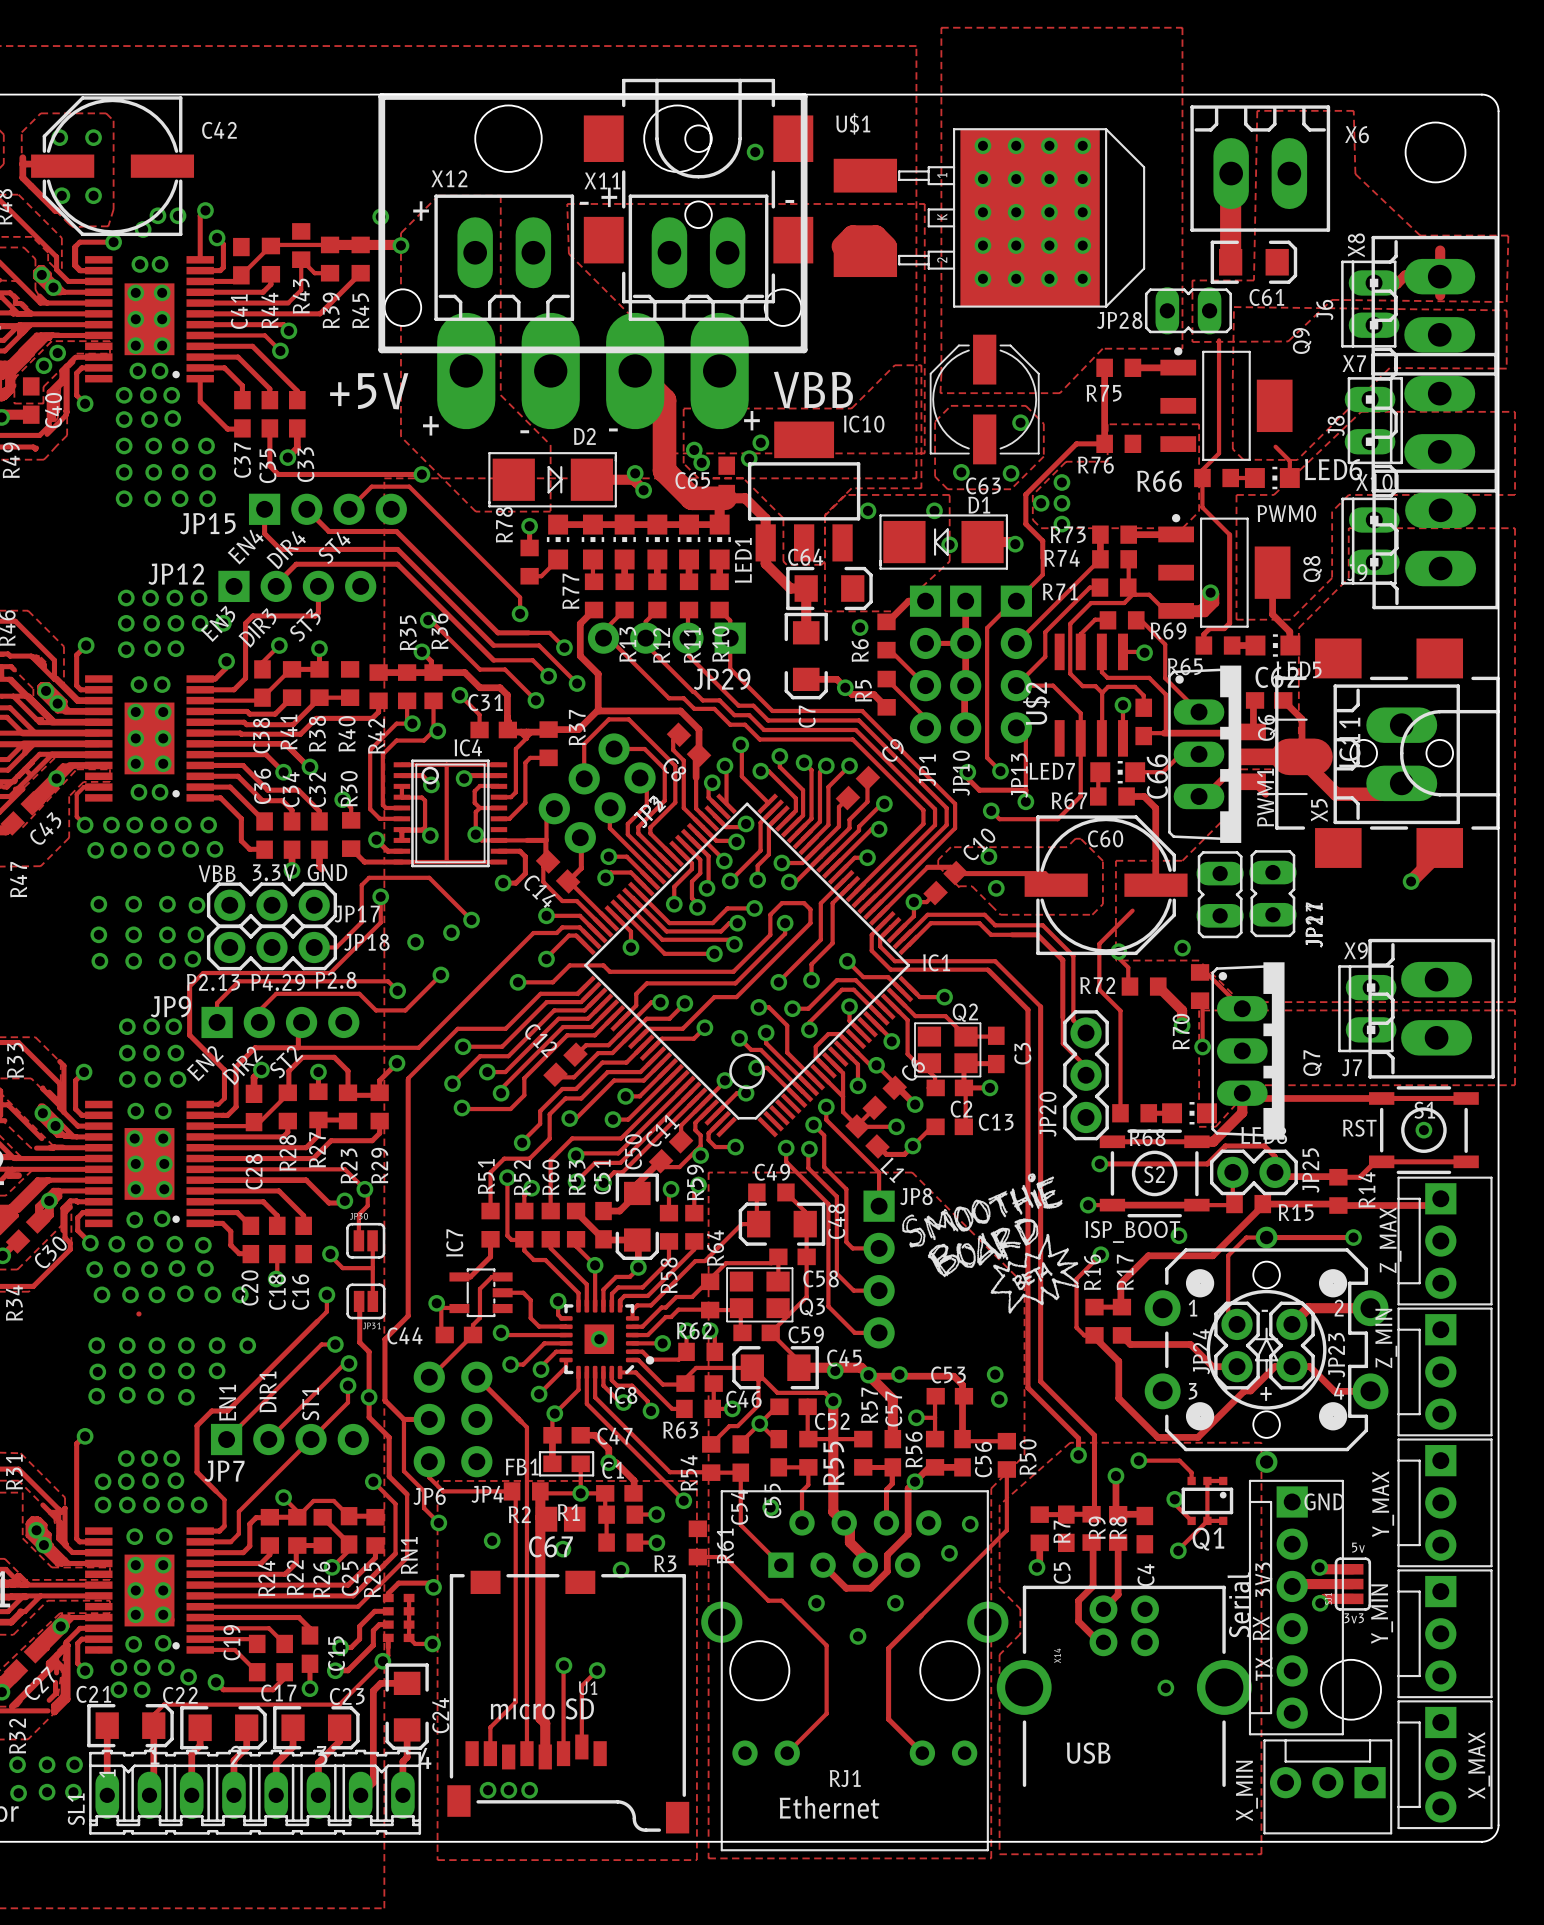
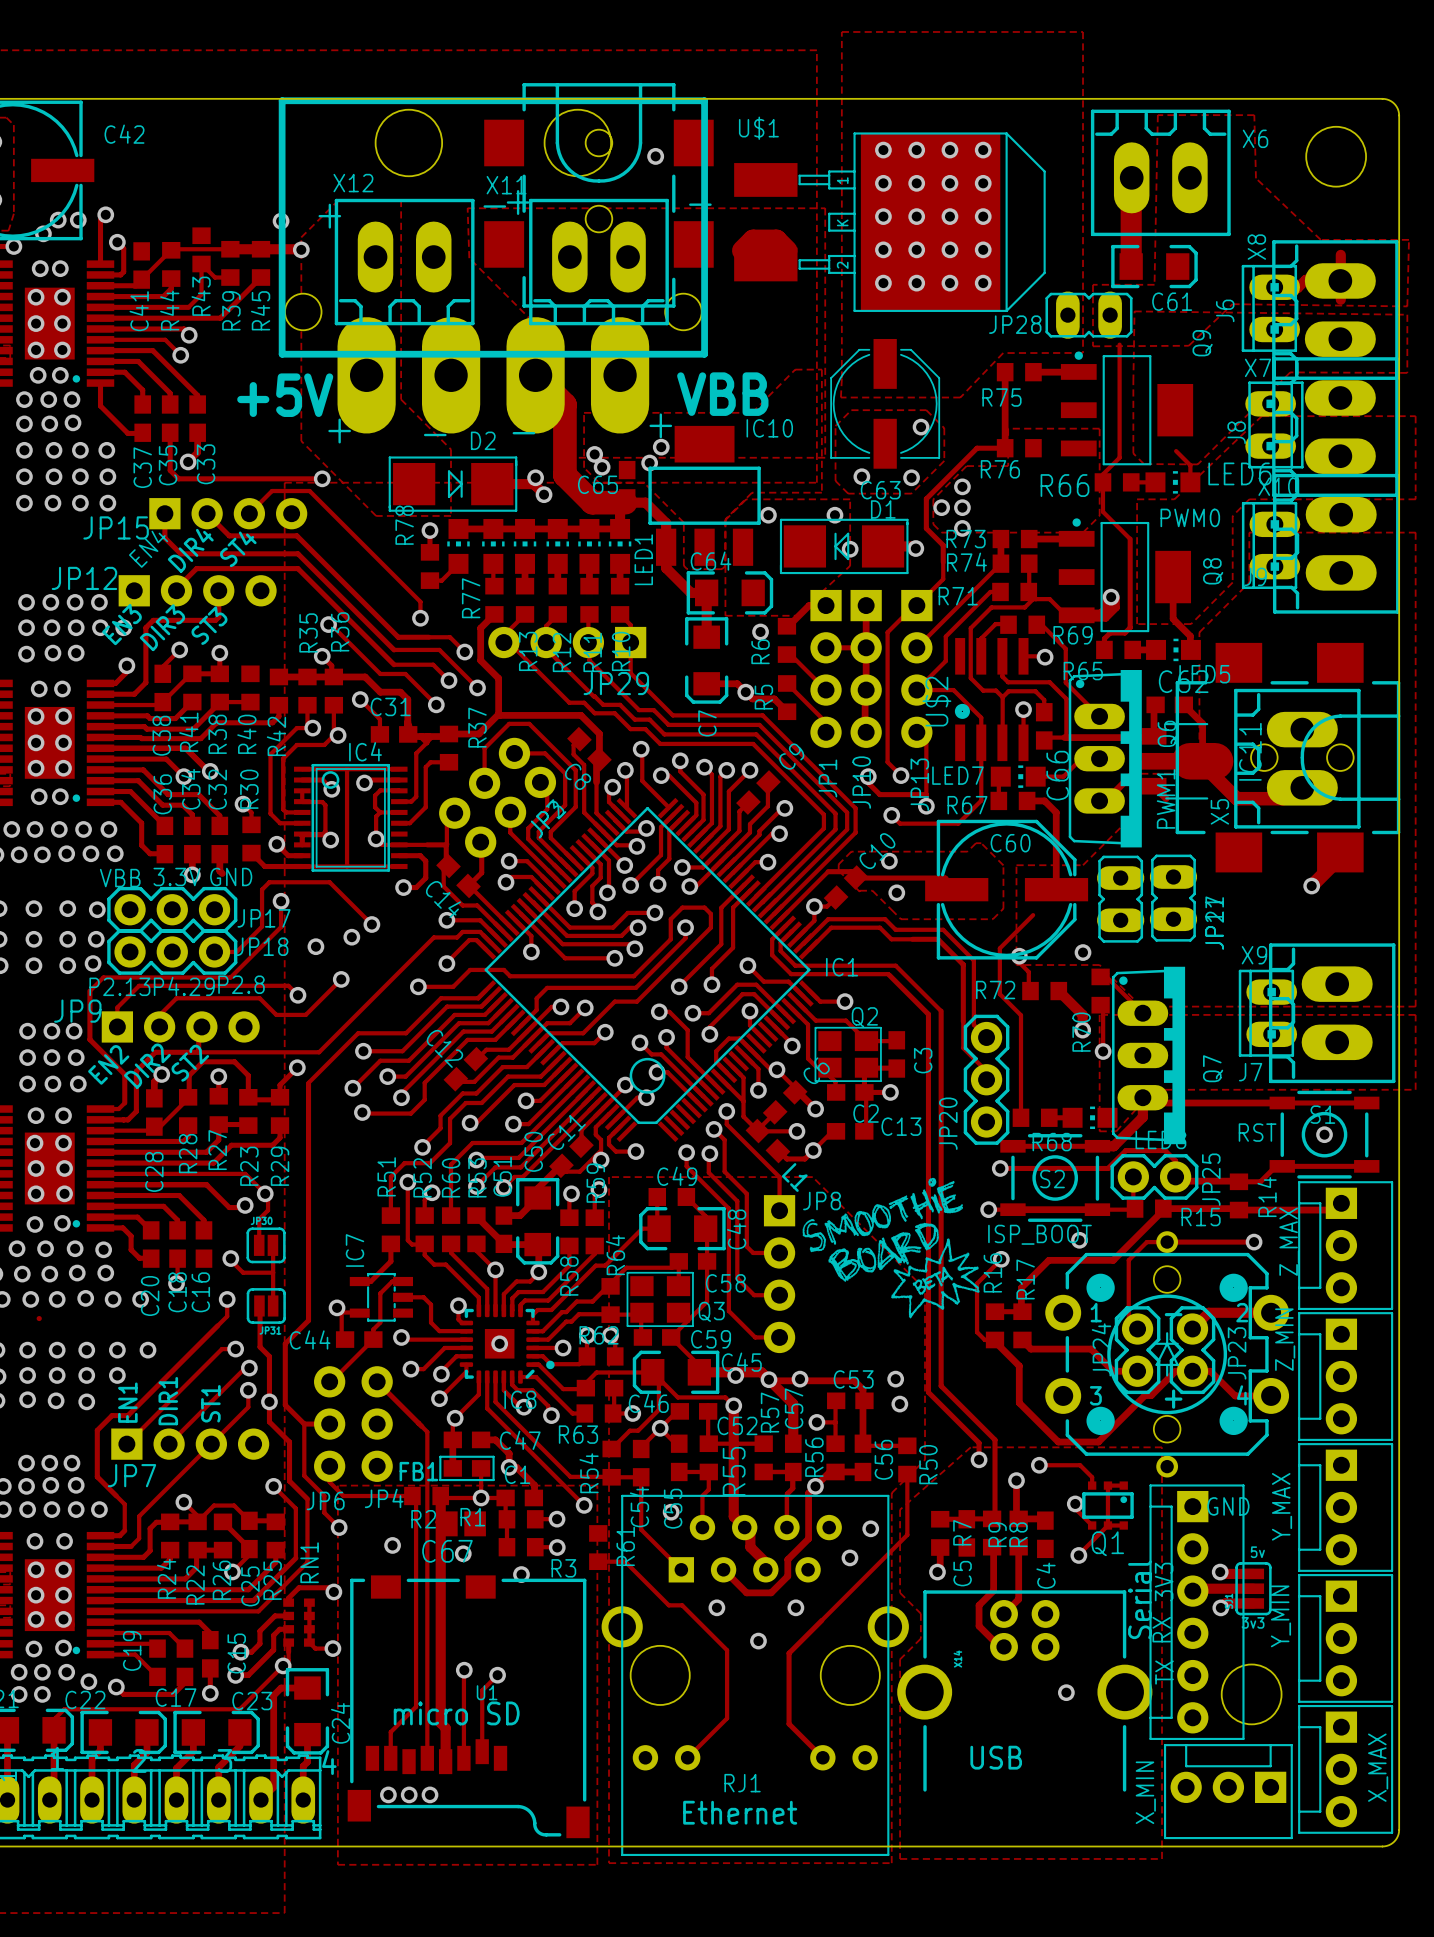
drawing: none -> [954, 703, 970, 719]

